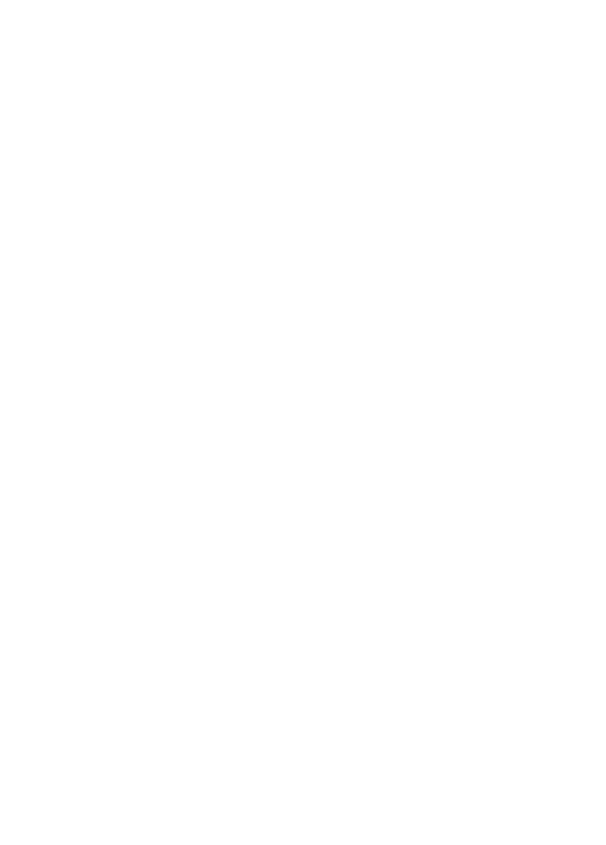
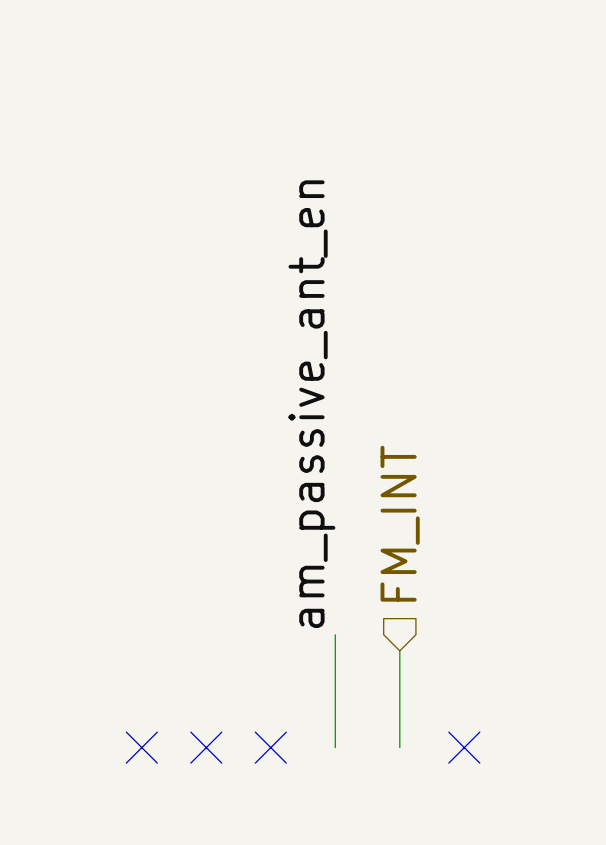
label: none -> am_passive_ant_en (311, 404)
hierarchical label: none -> FM_INT (400, 523)
wire: none -> (335, 634) (335, 747)
wire: none -> (399, 650) (399, 747)
no-connect mark: none -> (141, 747)
no-connect mark: none -> (206, 747)
no-connect mark: none -> (270, 747)
no-connect mark: none -> (464, 747)

